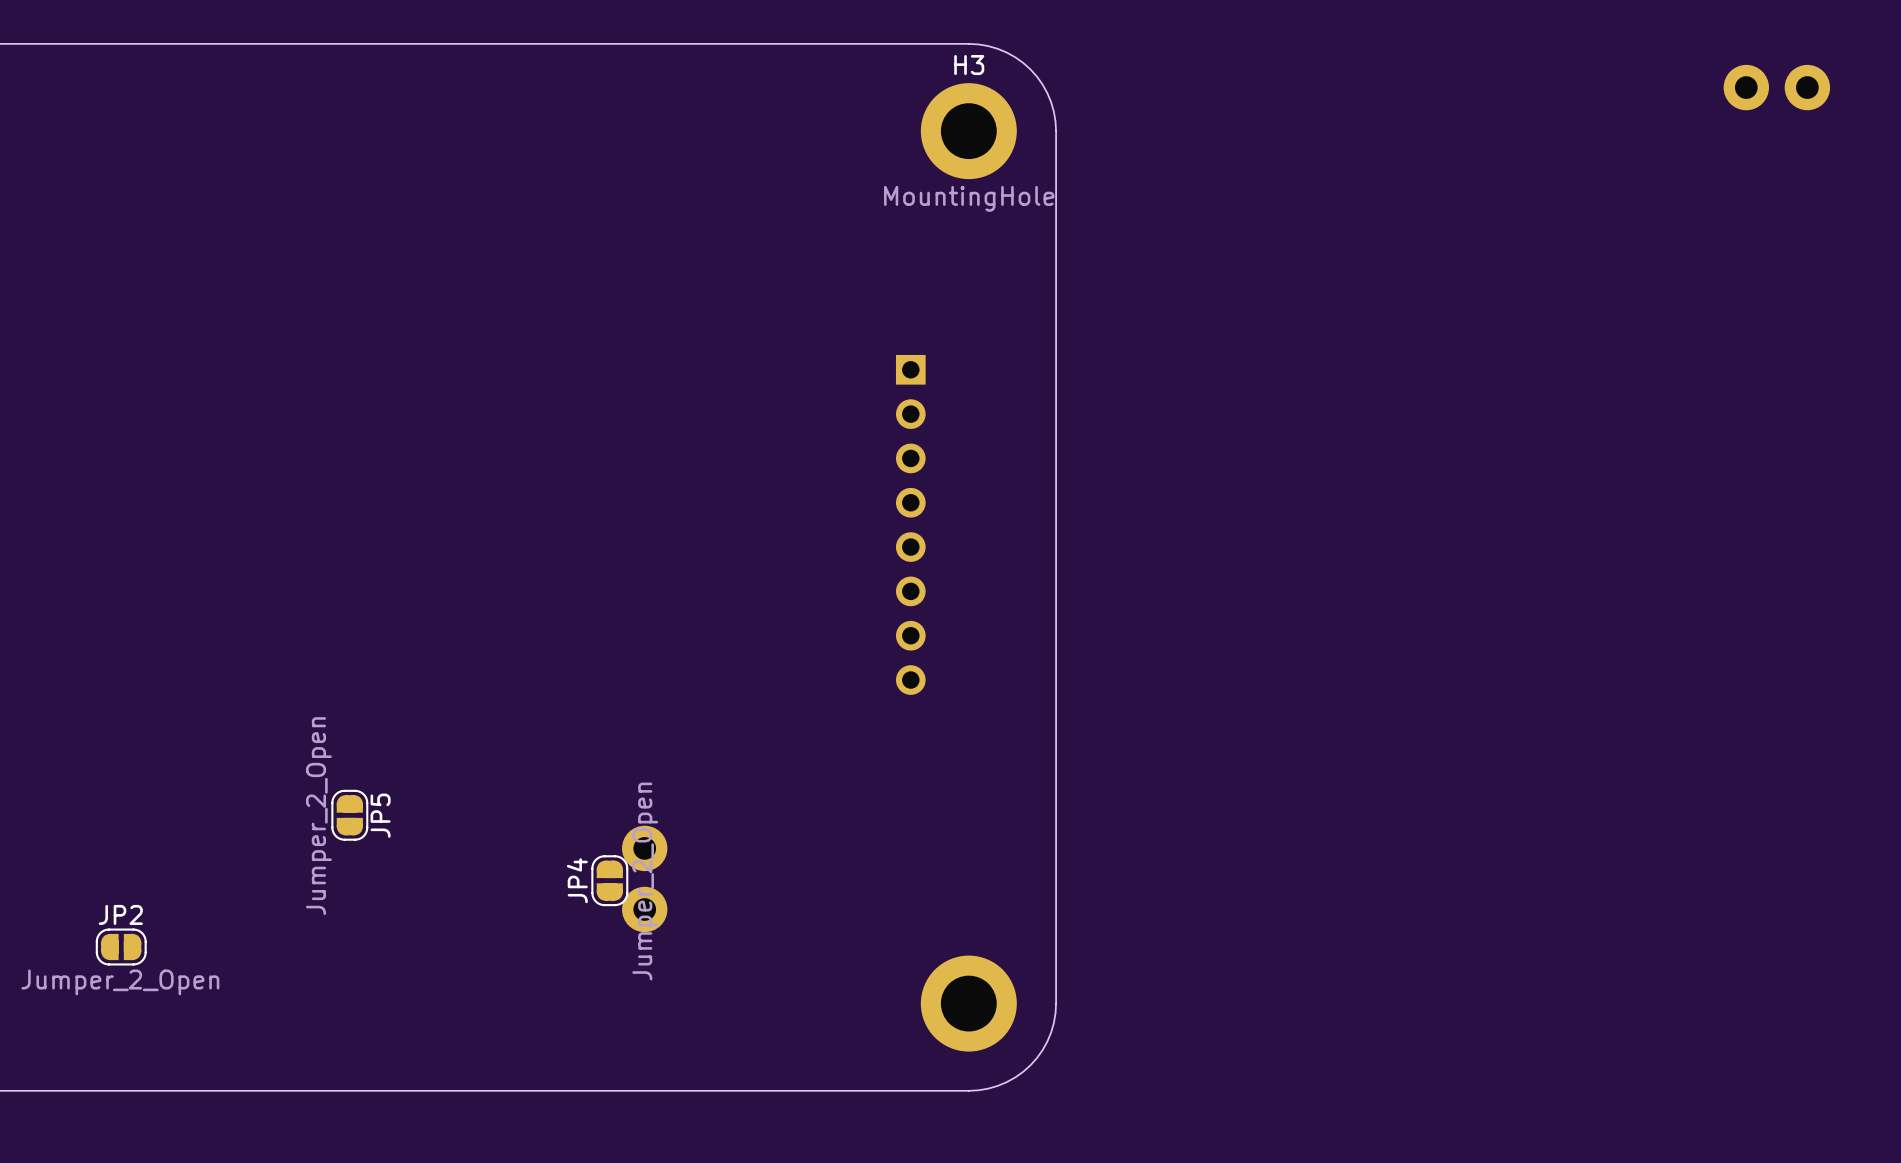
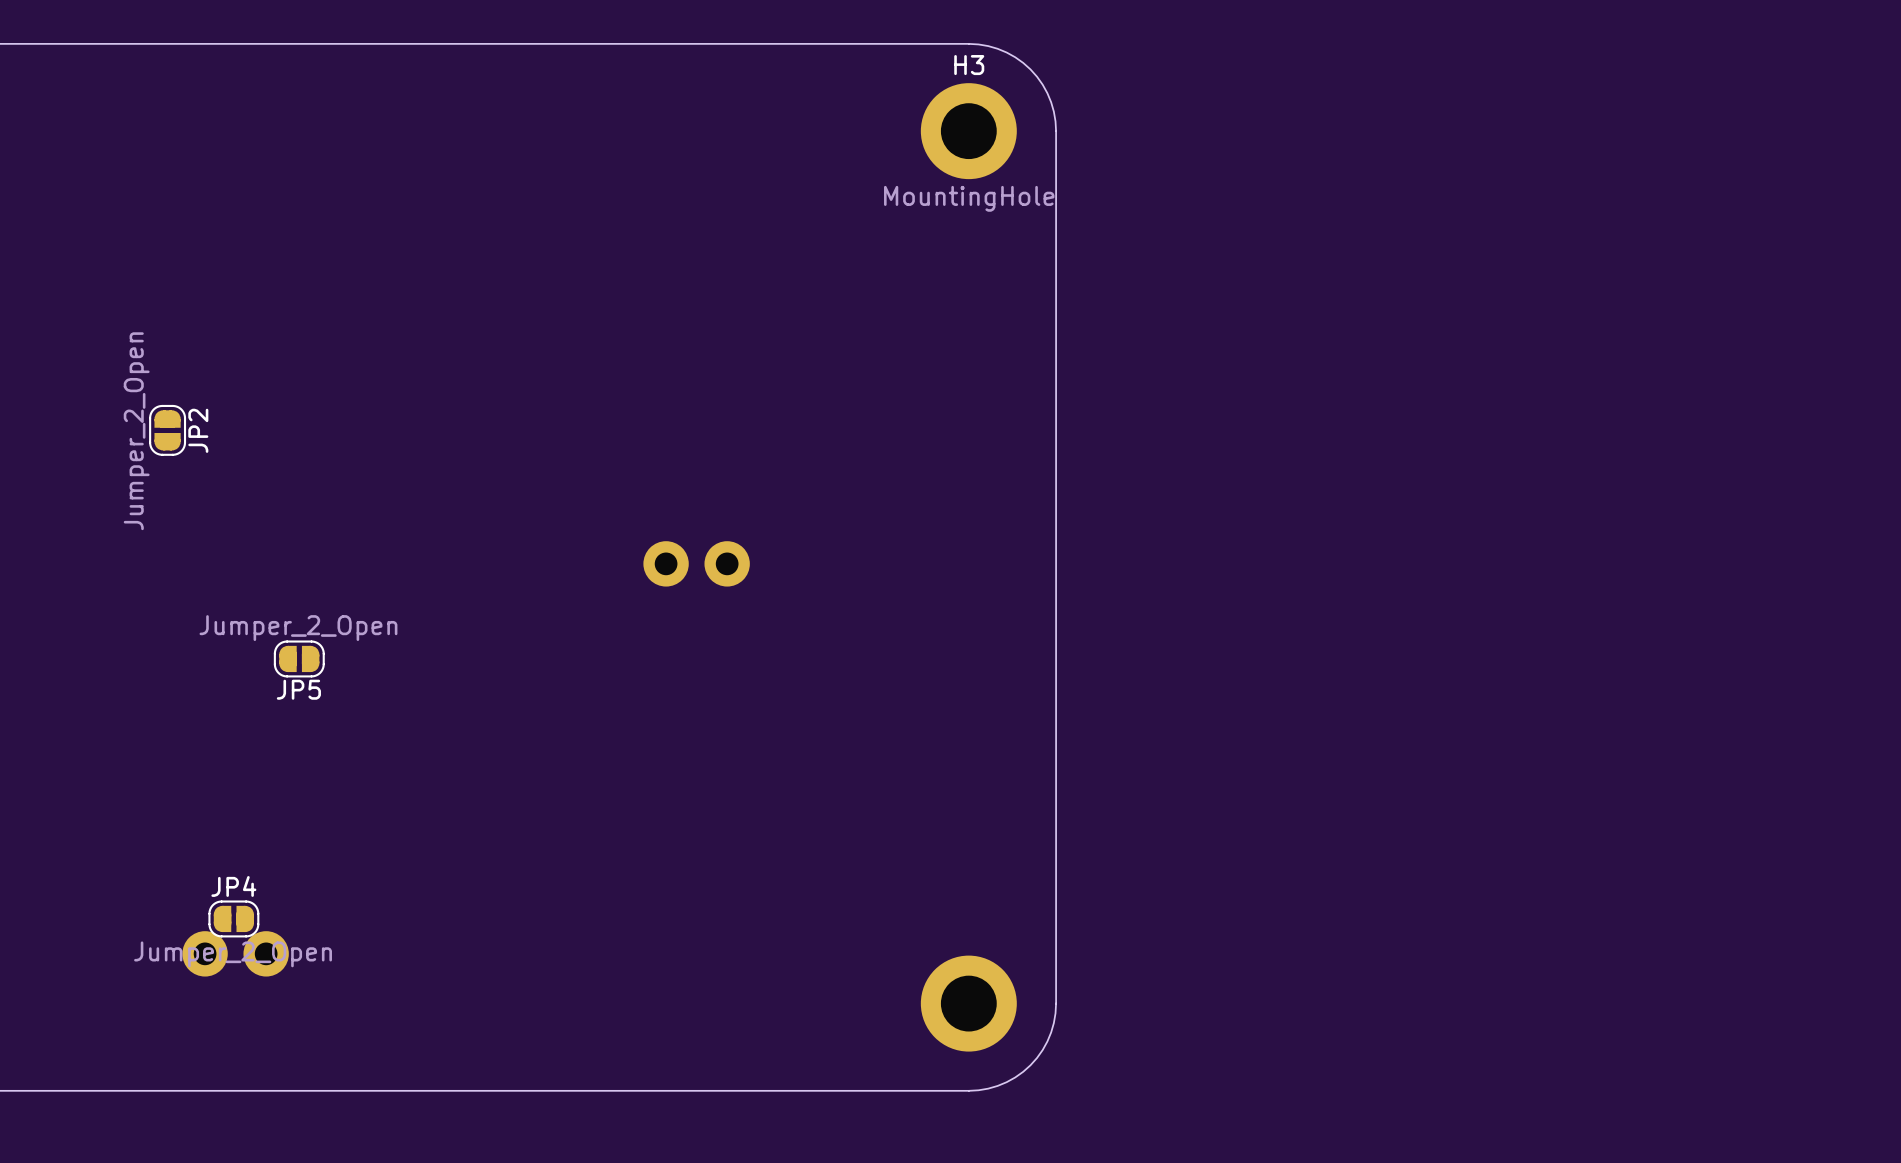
part: (1776, 87) -> none
part: (910, 524) -> none
part: none -> (696, 563)
JP5 rotation: 0° (349, 815) -> 90° clockwise (299, 658)
JP5 position: (349, 815) -> (299, 658)
part: (644, 878) -> none
JP4 rotation: 0° (609, 880) -> 90° clockwise (233, 918)
JP4 position: (609, 880) -> (233, 918)
JP2 rotation: 0° (121, 947) -> 90° clockwise (167, 430)
JP2 position: (121, 947) -> (167, 430)
part: none -> (235, 953)

